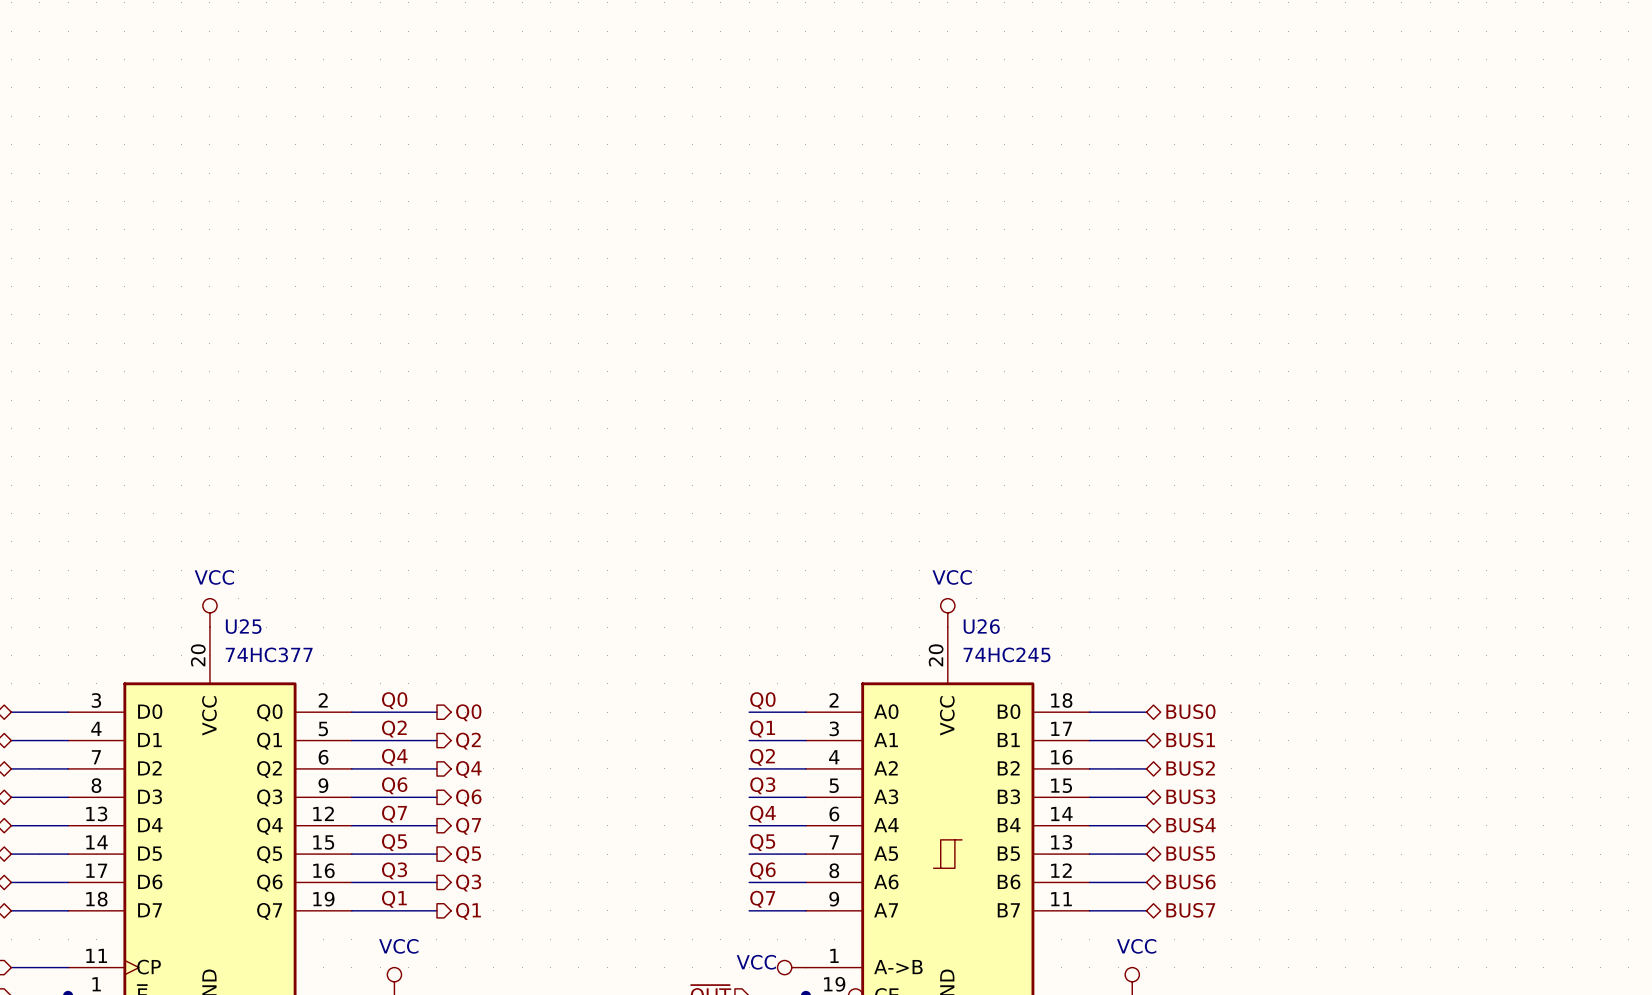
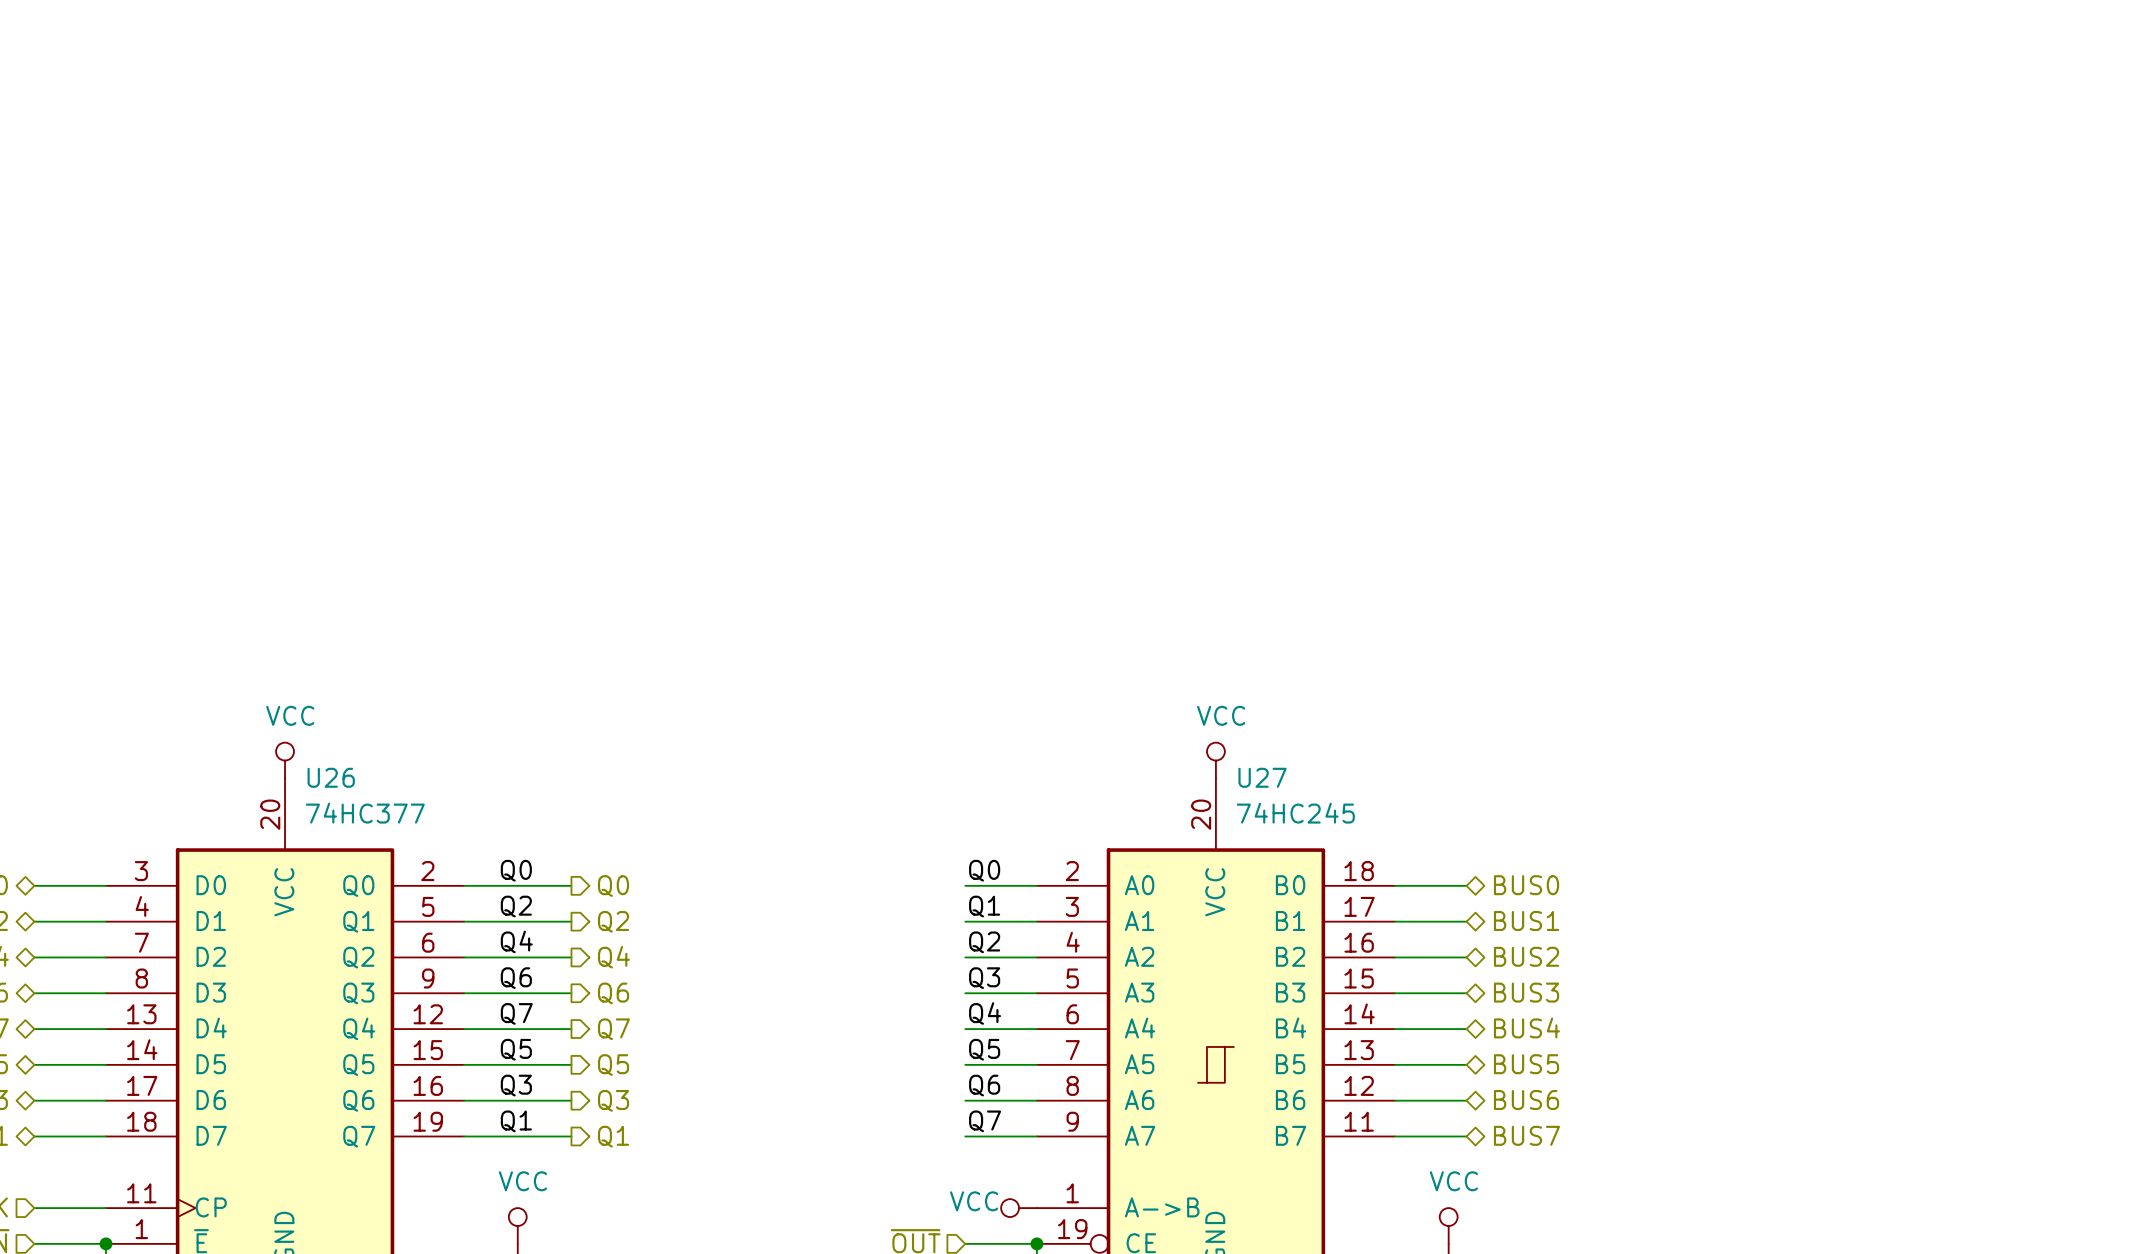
U25 name: U25 (243, 626) -> U26 (331, 777)
U26 name: U26 (981, 626) -> U27 (1262, 777)

